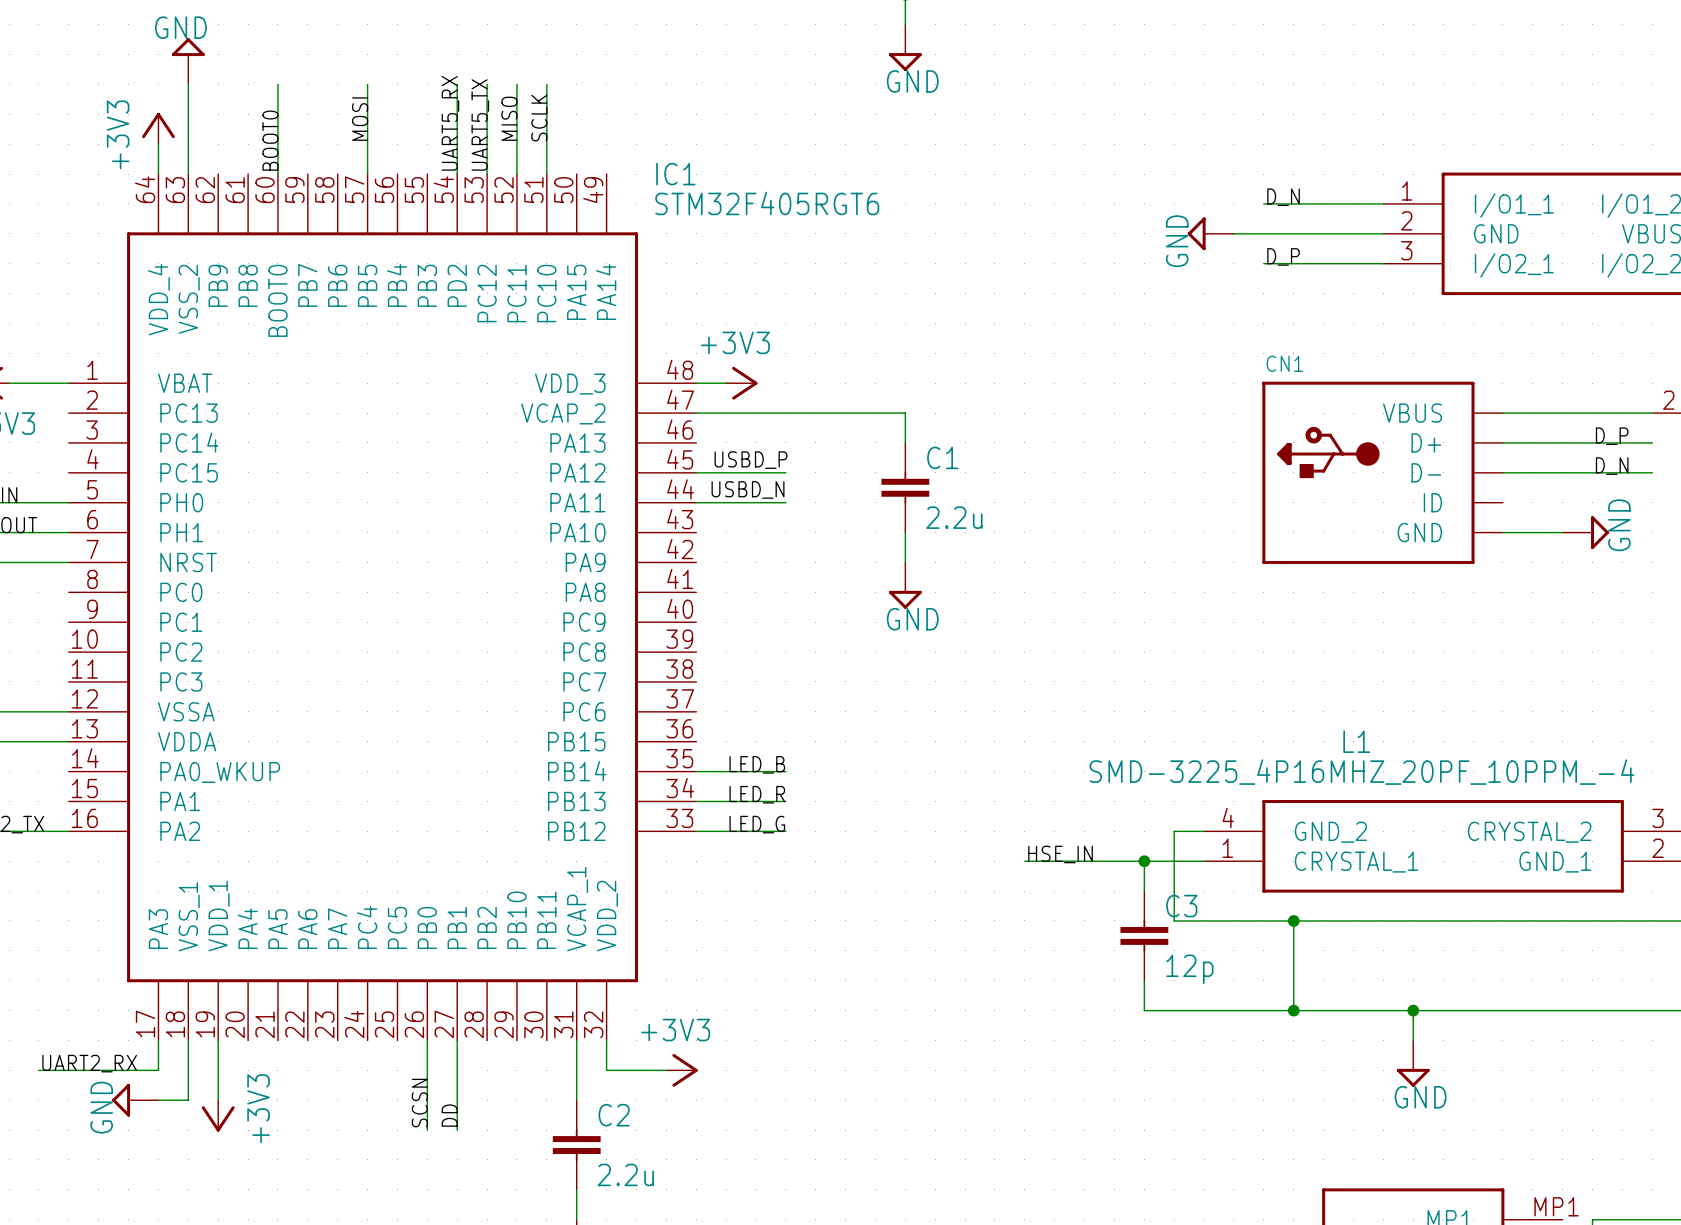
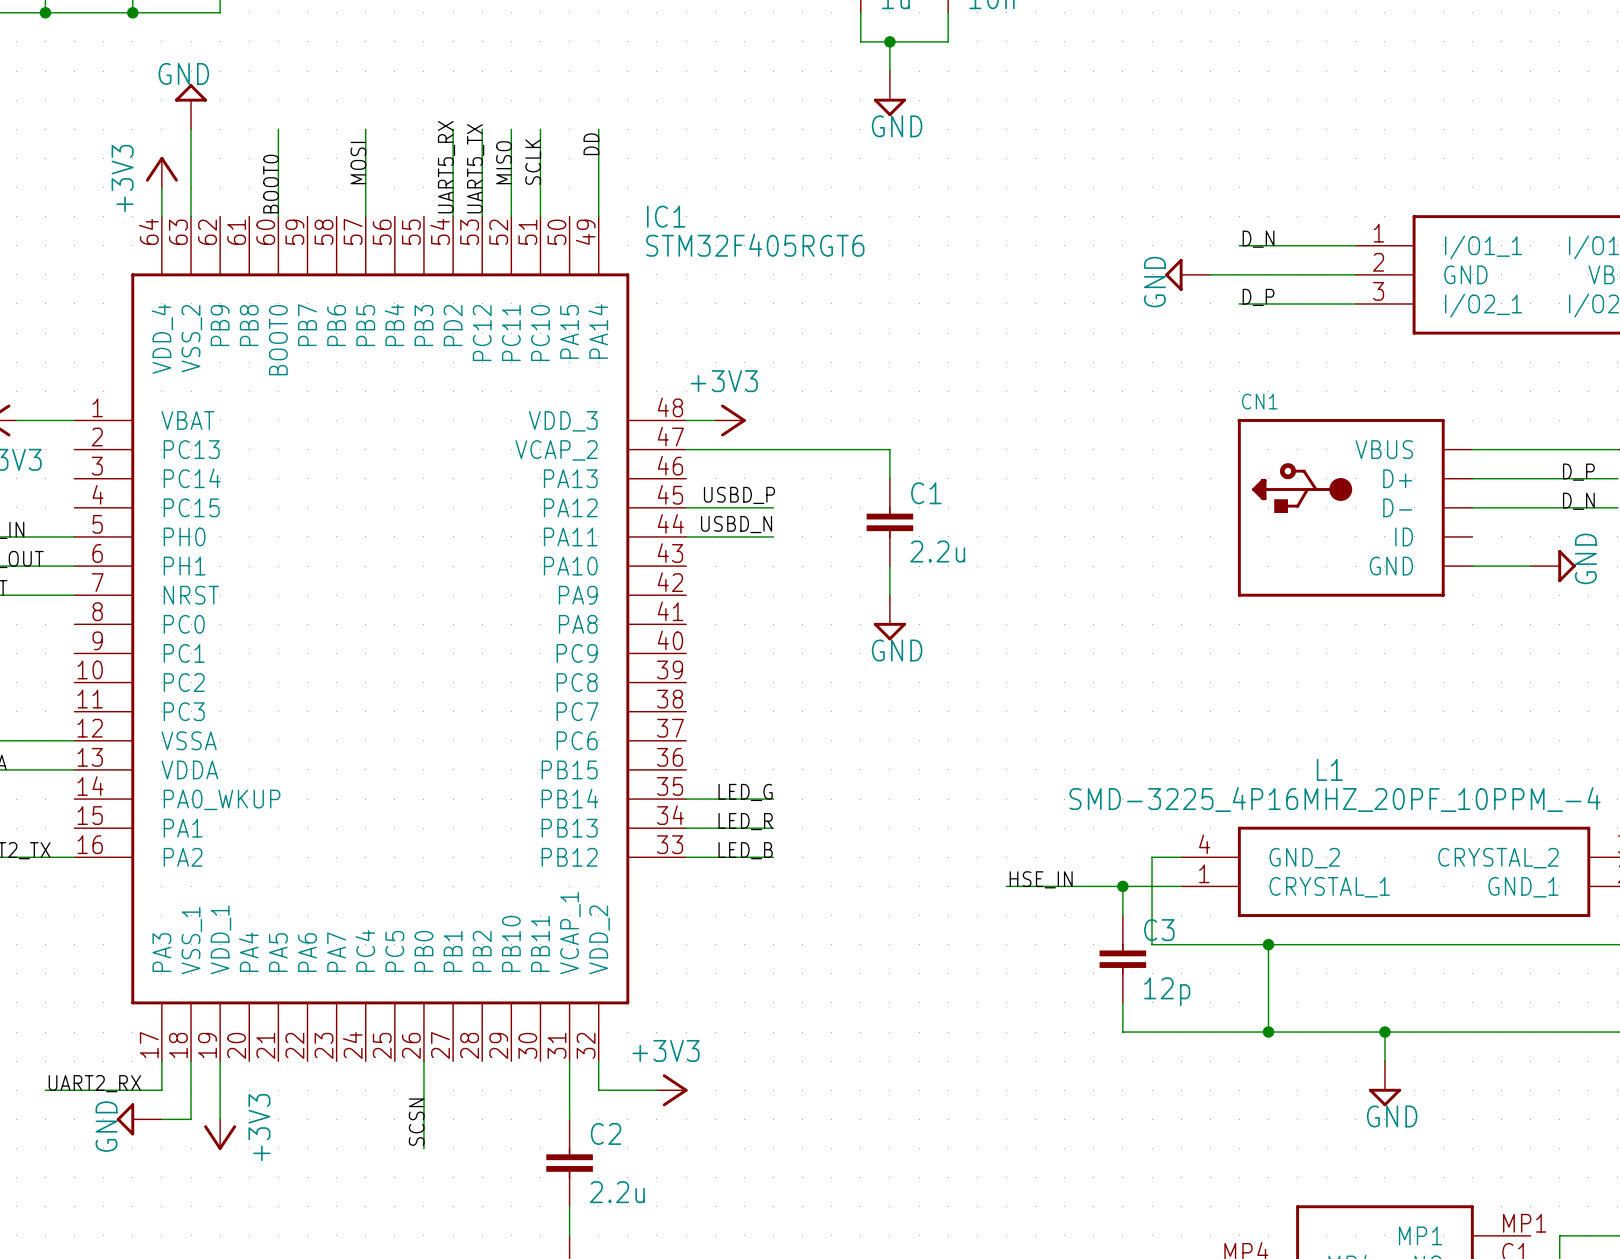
wire: none -> (598, 129) (598, 216)
label: none -> DD (591, 144)
label: LED_B (757, 764) -> LED_G (745, 792)
label: LED_G (757, 824) -> LED_B (745, 850)
wire: (457, 1040) (457, 1130) -> none
label: DD (449, 1115) -> none

